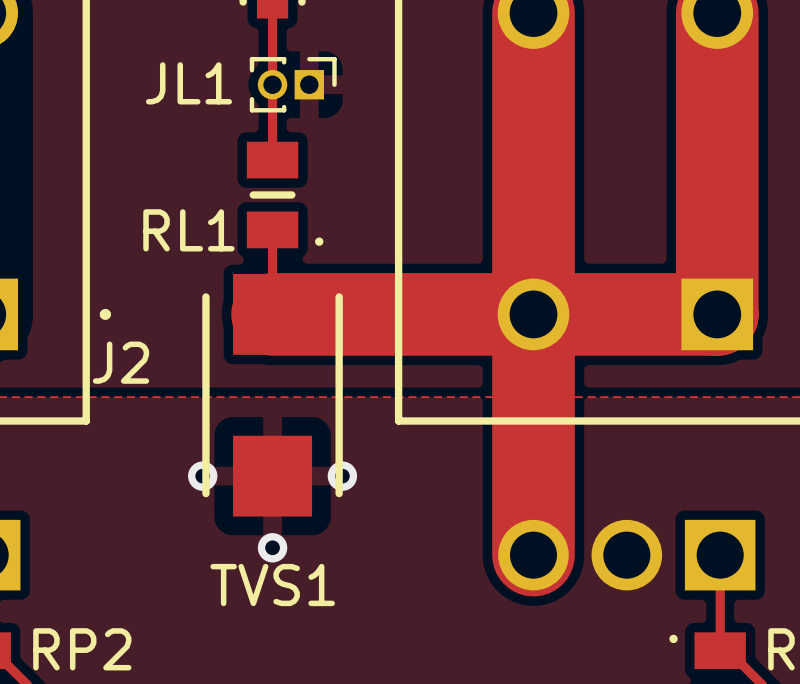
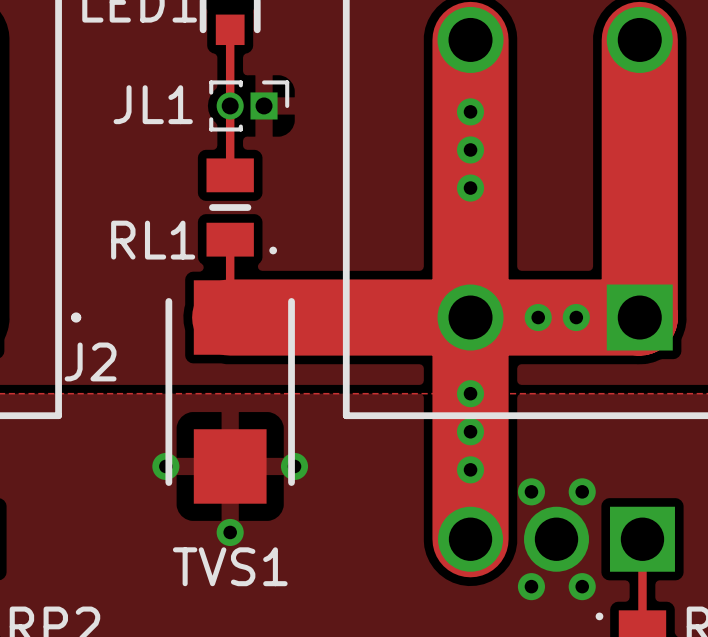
via: none -> (470, 111)
via: none -> (470, 149)
via: none -> (470, 188)
via: none -> (538, 317)
via: none -> (576, 317)
via: none -> (470, 393)
via: none -> (470, 431)
via: none -> (470, 469)
via: none -> (531, 491)
via: none -> (582, 491)
via: none -> (531, 586)
via: none -> (582, 586)

